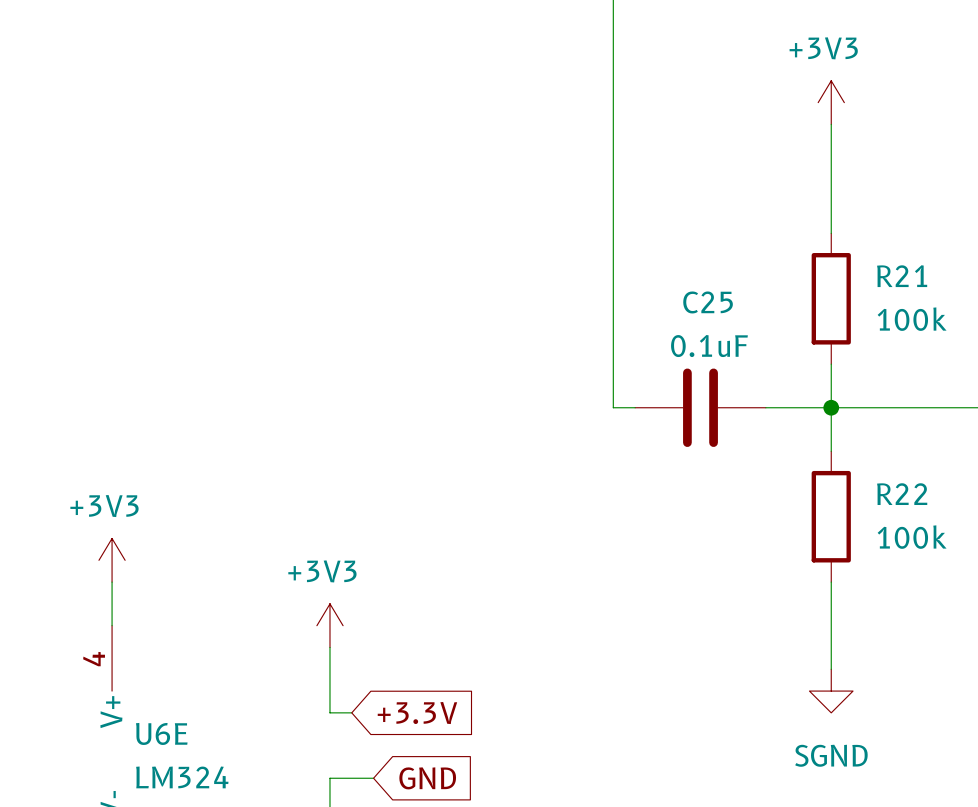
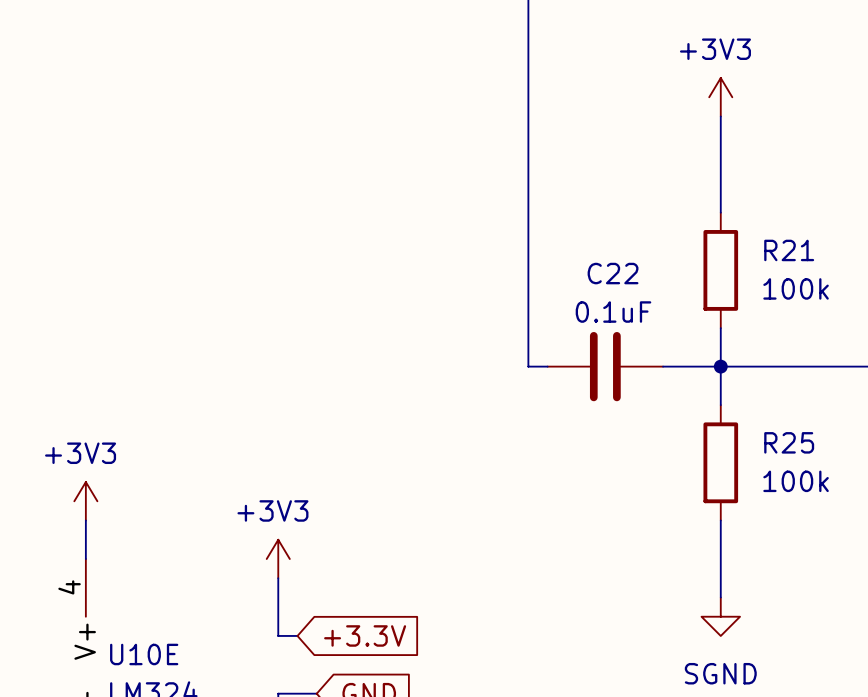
C25 name: C25 (708, 302) -> C22 (613, 273)
R22 name: R22 (902, 494) -> R25 (789, 442)
U6E name: U6E (161, 733) -> U10E (144, 654)

